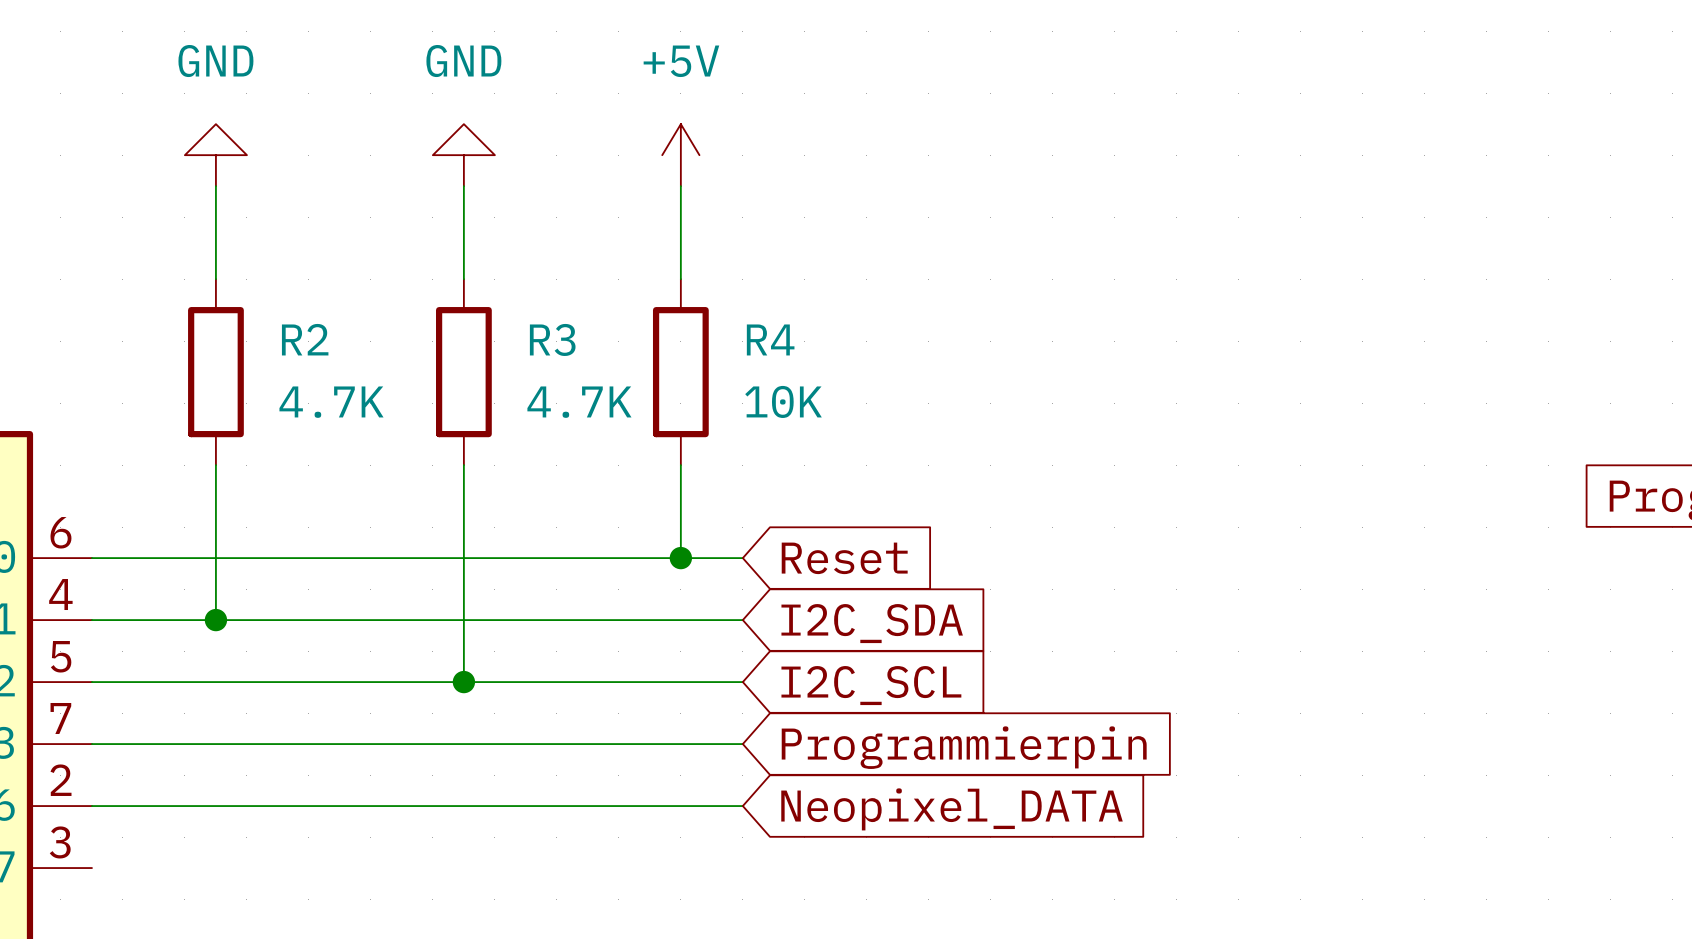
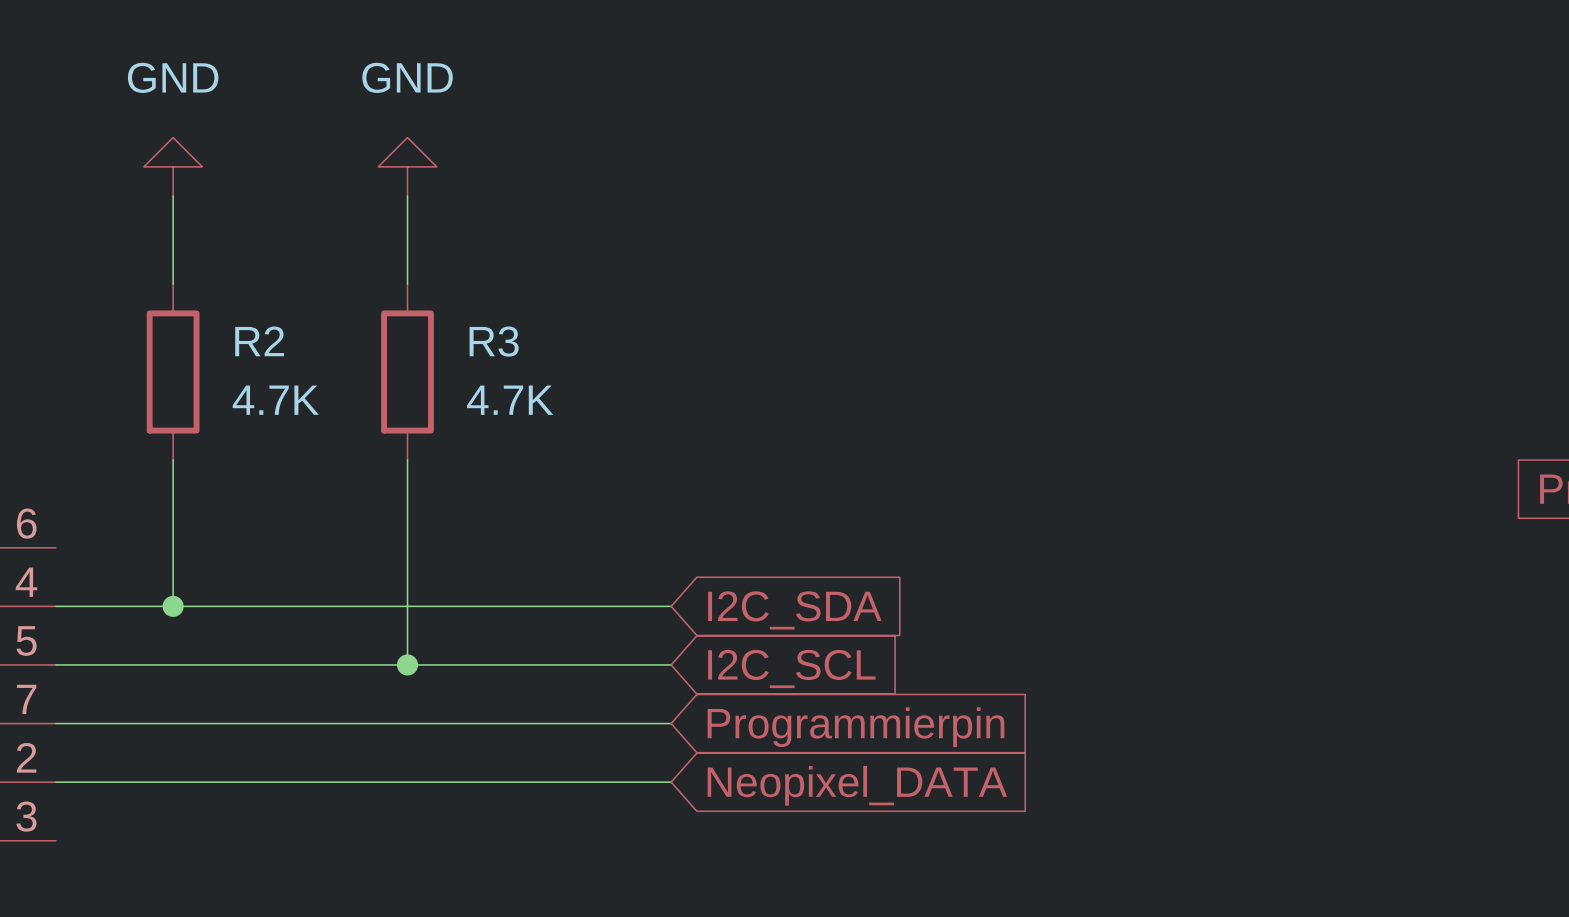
power symbol: +5V (680, 155) -> none
wire: (680, 186) (680, 279) -> none
R4: 10K (680, 372) -> none
wire: (680, 465) (680, 558) -> none
wire: (91, 558) (742, 558) -> none
junction: (680, 558) -> none
global label: Reset (844, 558) -> none

